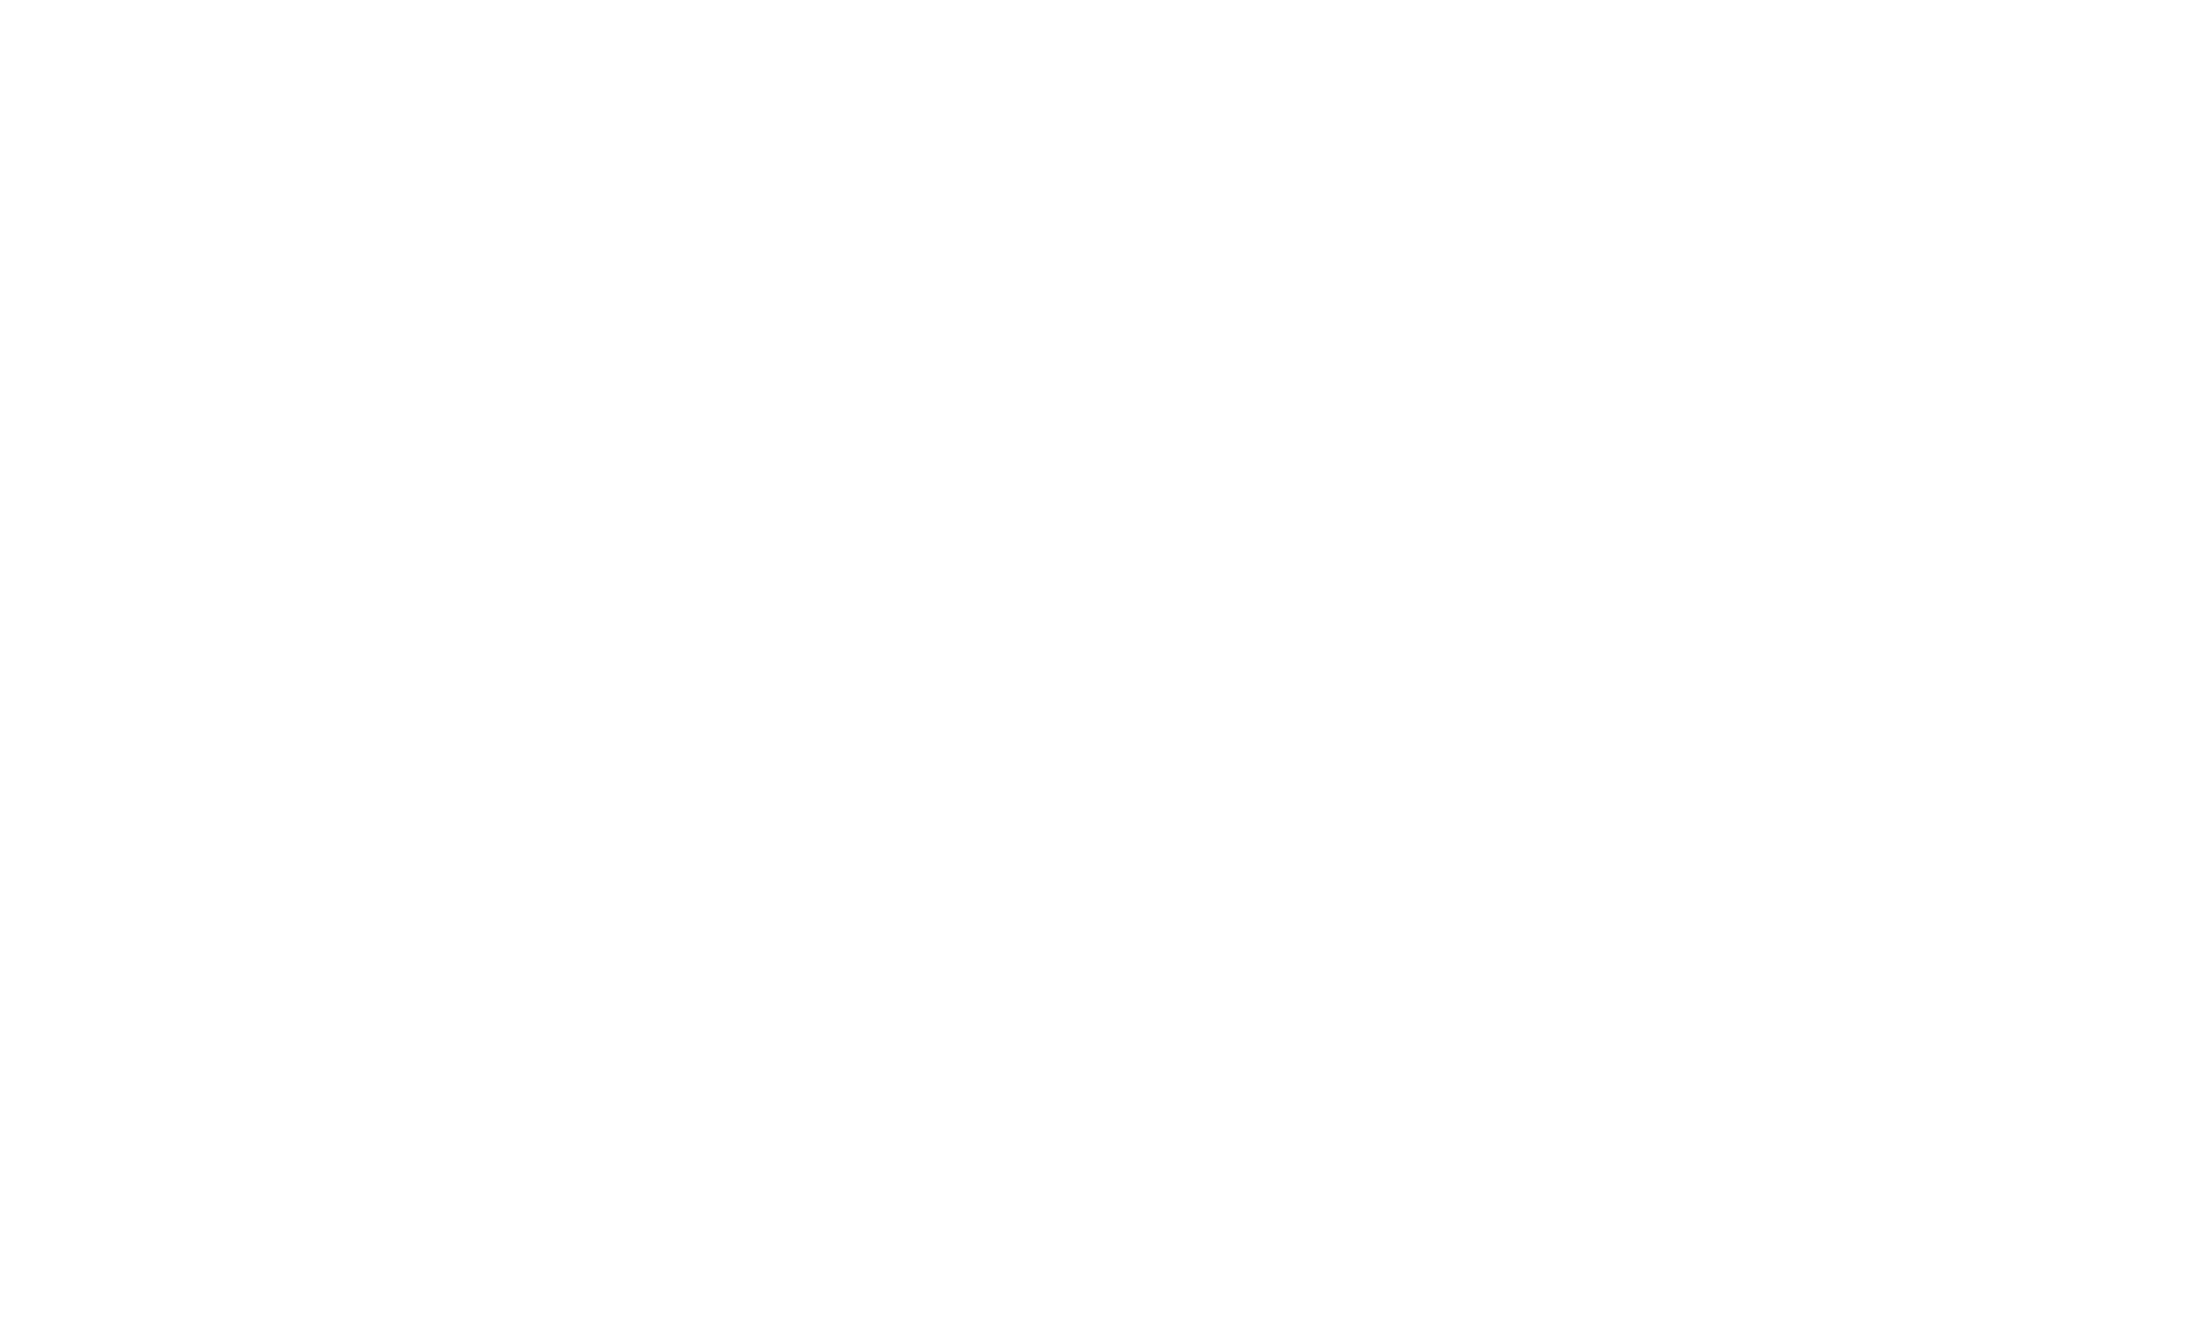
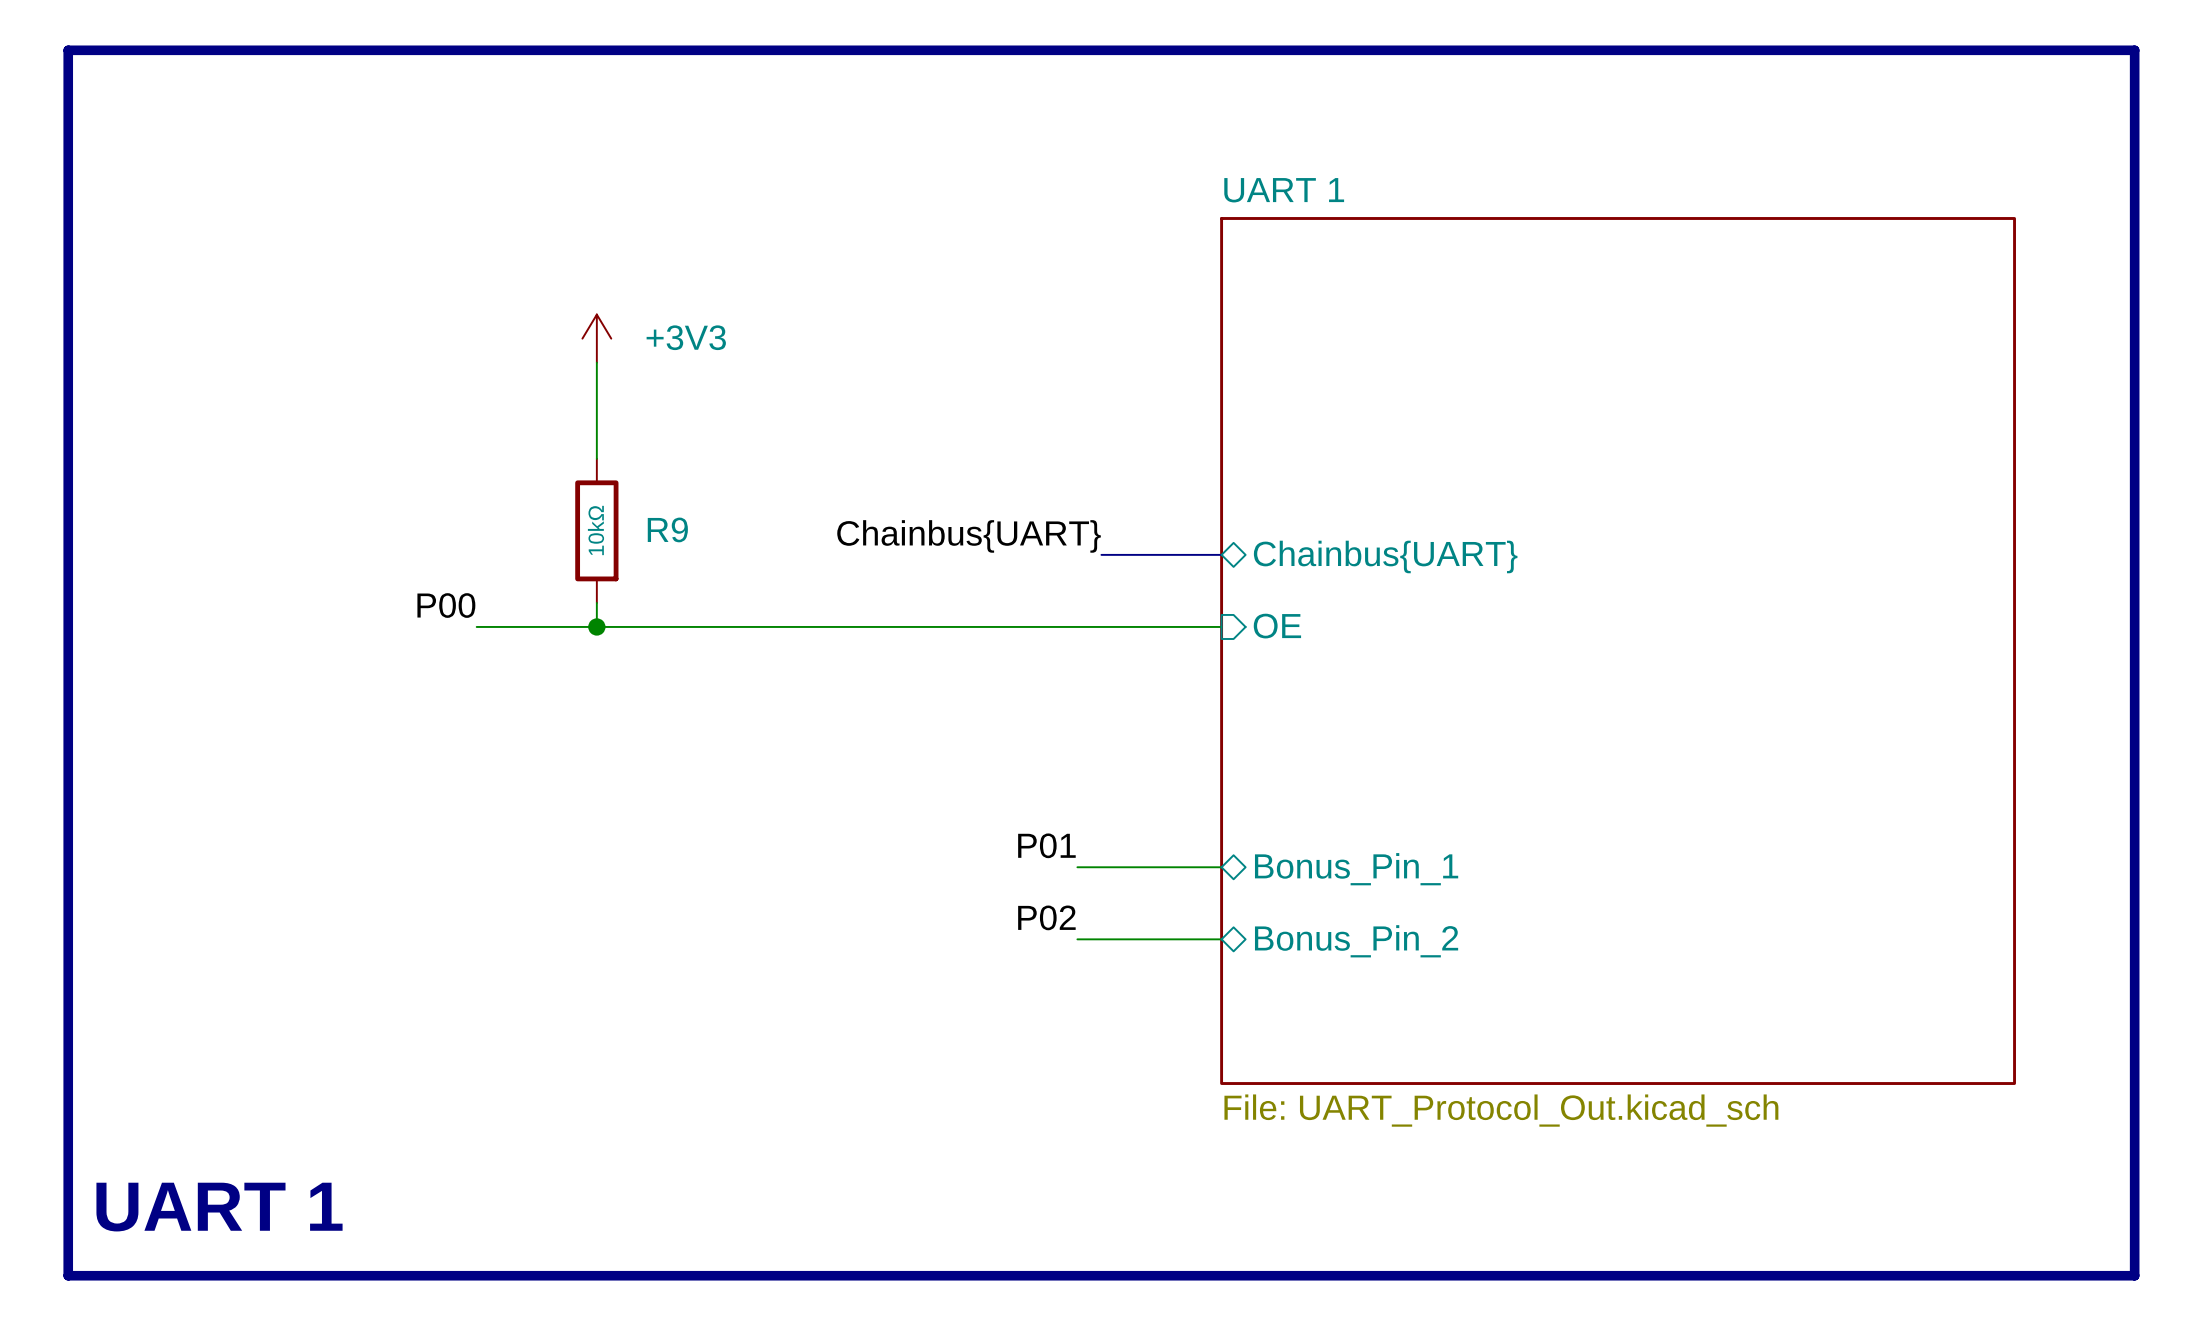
line: none -> (68, 50) (2134, 50) (2134, 1275) (68, 1275) (68, 50)
power symbol: none -> +3V3 (596, 338)
wire: none -> (596, 362) (596, 458)
R9: none -> 10kΩ (596, 530)
label: none -> Chainbus{UART} (969, 536)
bus: none -> (1101, 554) (1221, 554)
sheet pin: none -> Chainbus{UART} (1385, 556)
wire: none -> (596, 602) (596, 626)
label: none -> P00 (446, 605)
wire: none -> (476, 626) (1221, 626)
junction: none -> (596, 626)
sheet pin: none -> OE (1277, 626)
sheet UART 1: none -> File: UART_Protocol_Out.kicad_sch (1618, 651)
label: none -> P01 (1046, 845)
wire: none -> (1077, 867) (1221, 867)
sheet pin: none -> Bonus_Pin_1 (1356, 869)
label: none -> P02 (1046, 917)
wire: none -> (1077, 939) (1221, 939)
sheet pin: none -> Bonus_Pin_2 (1356, 941)
text: none -> UART 1 (219, 1207)

